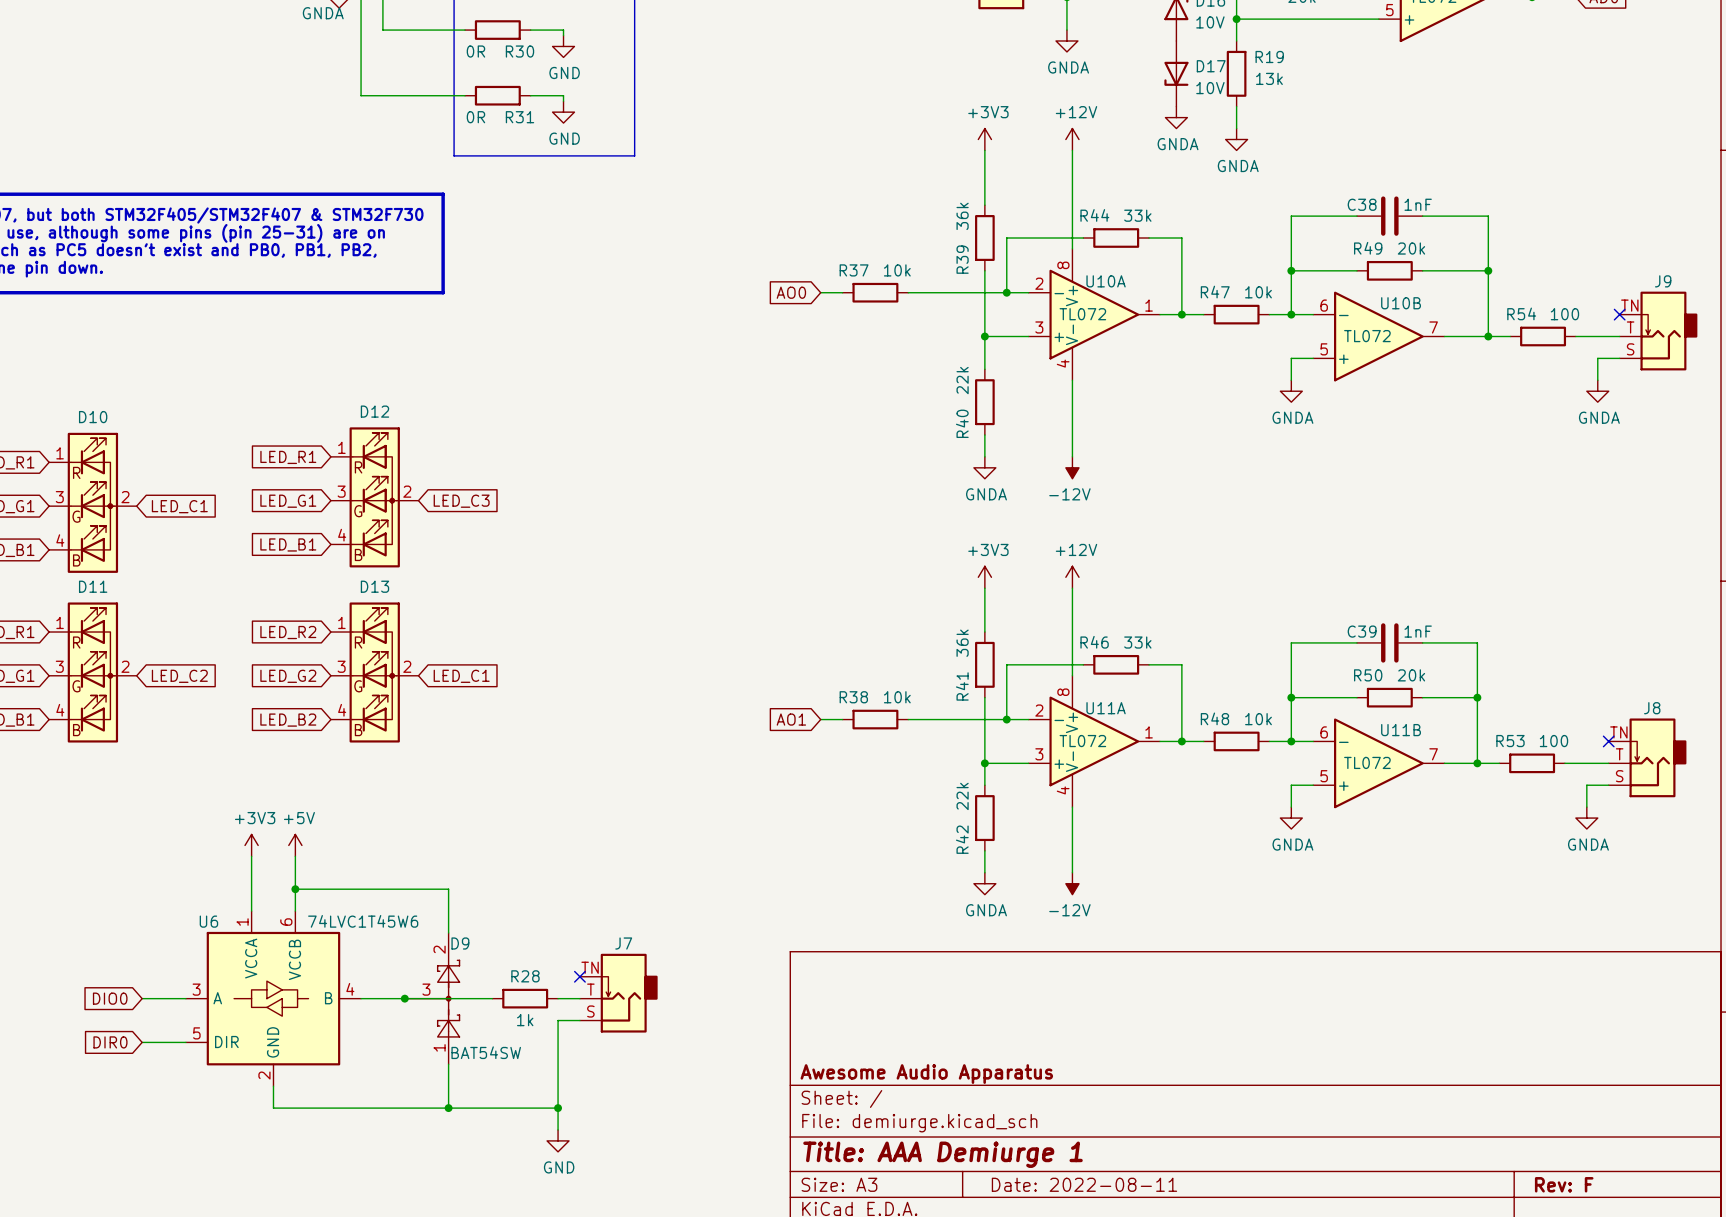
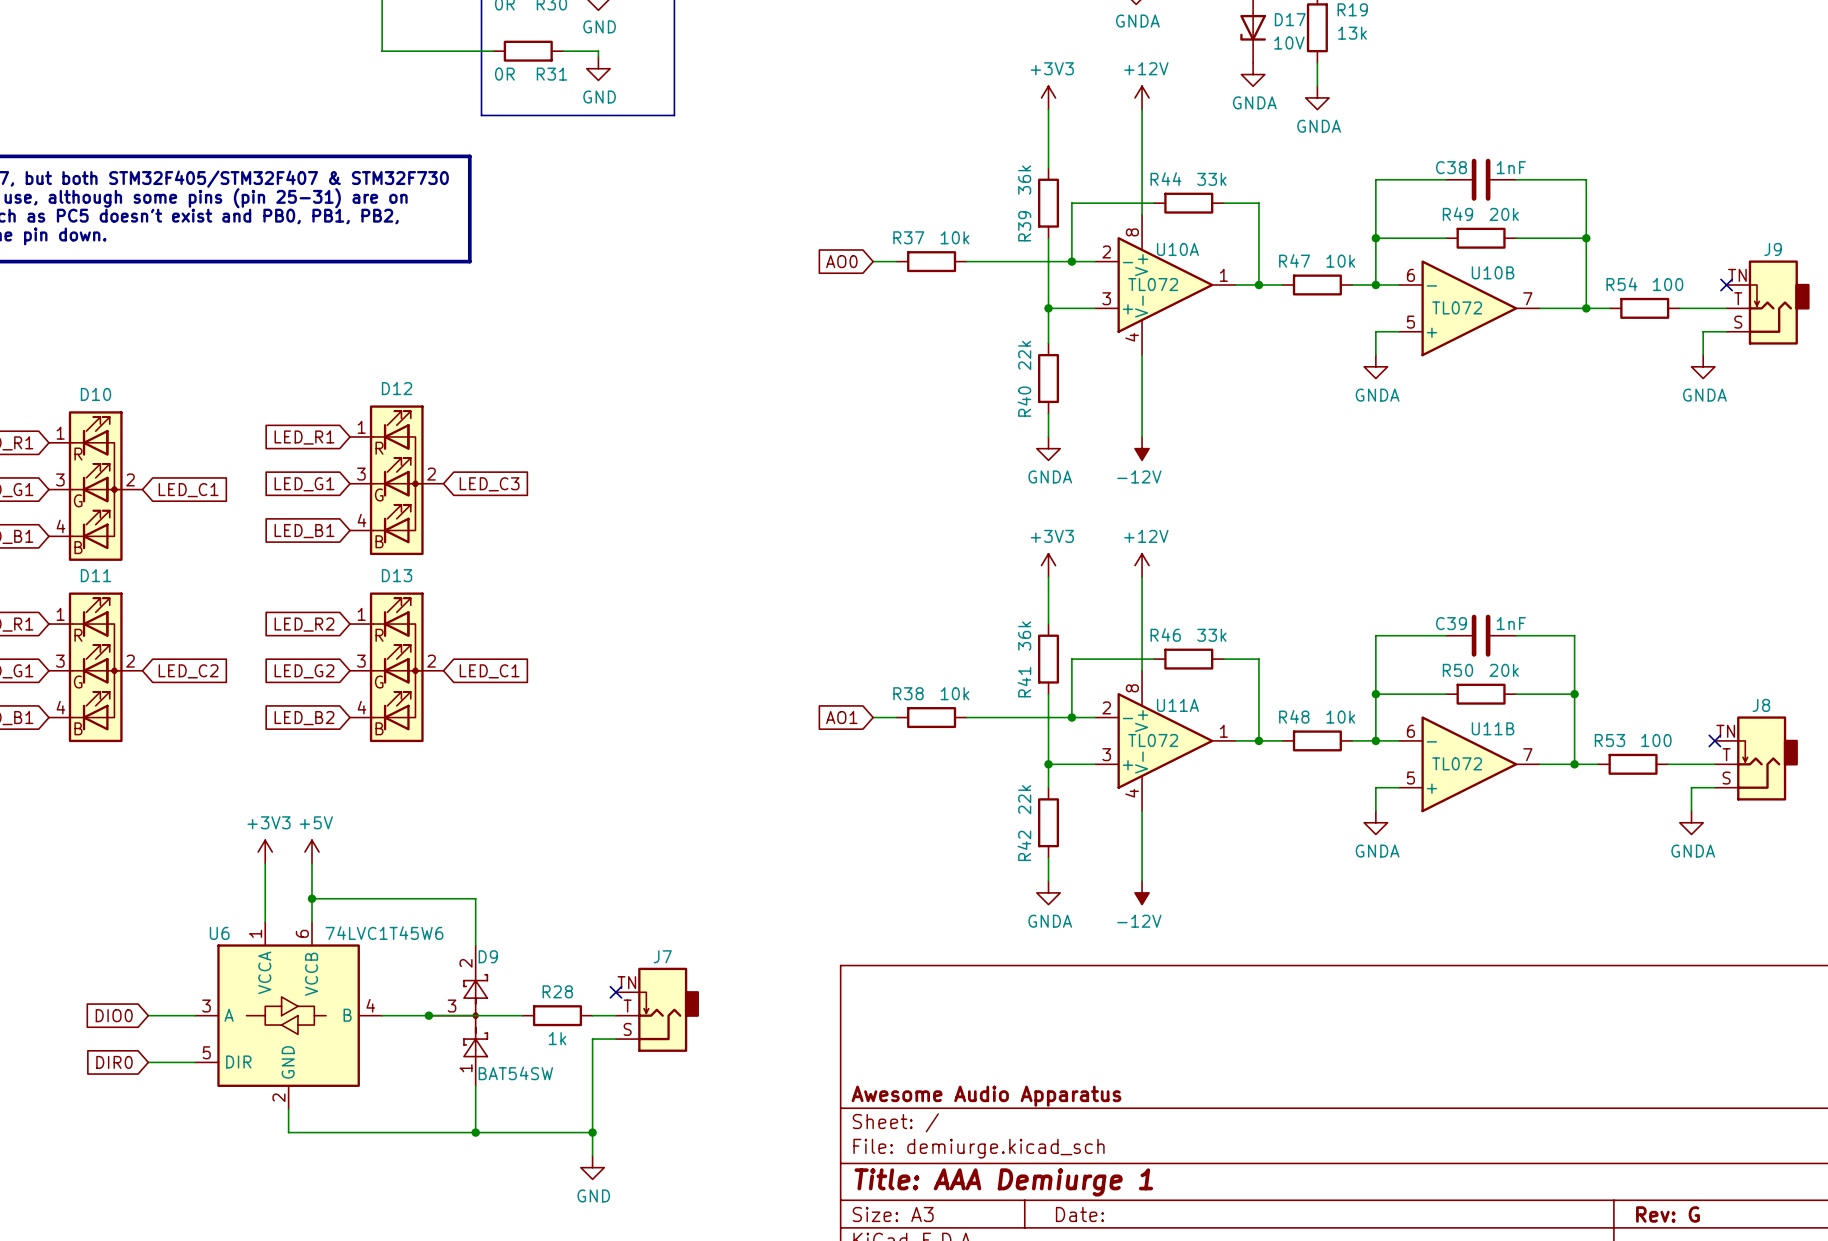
title block: Date: 2022-08-11 (1084, 1184) -> Date: (1079, 1214)
title block: Rev: F (1564, 1184) -> Rev: G (1668, 1214)

